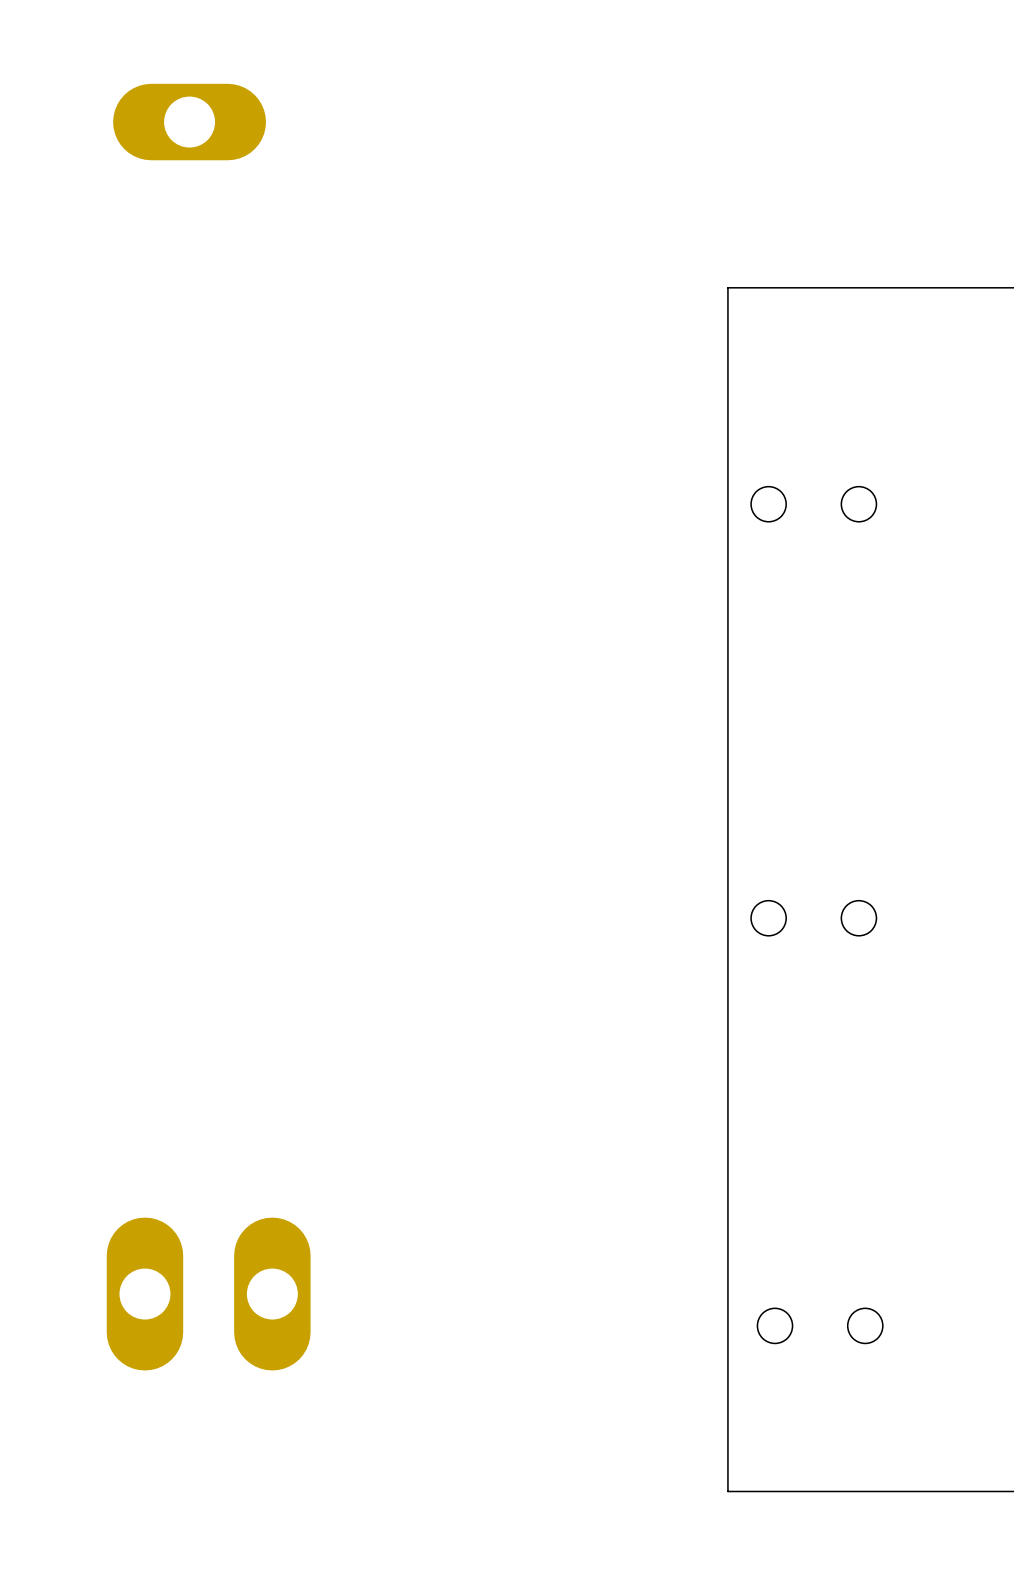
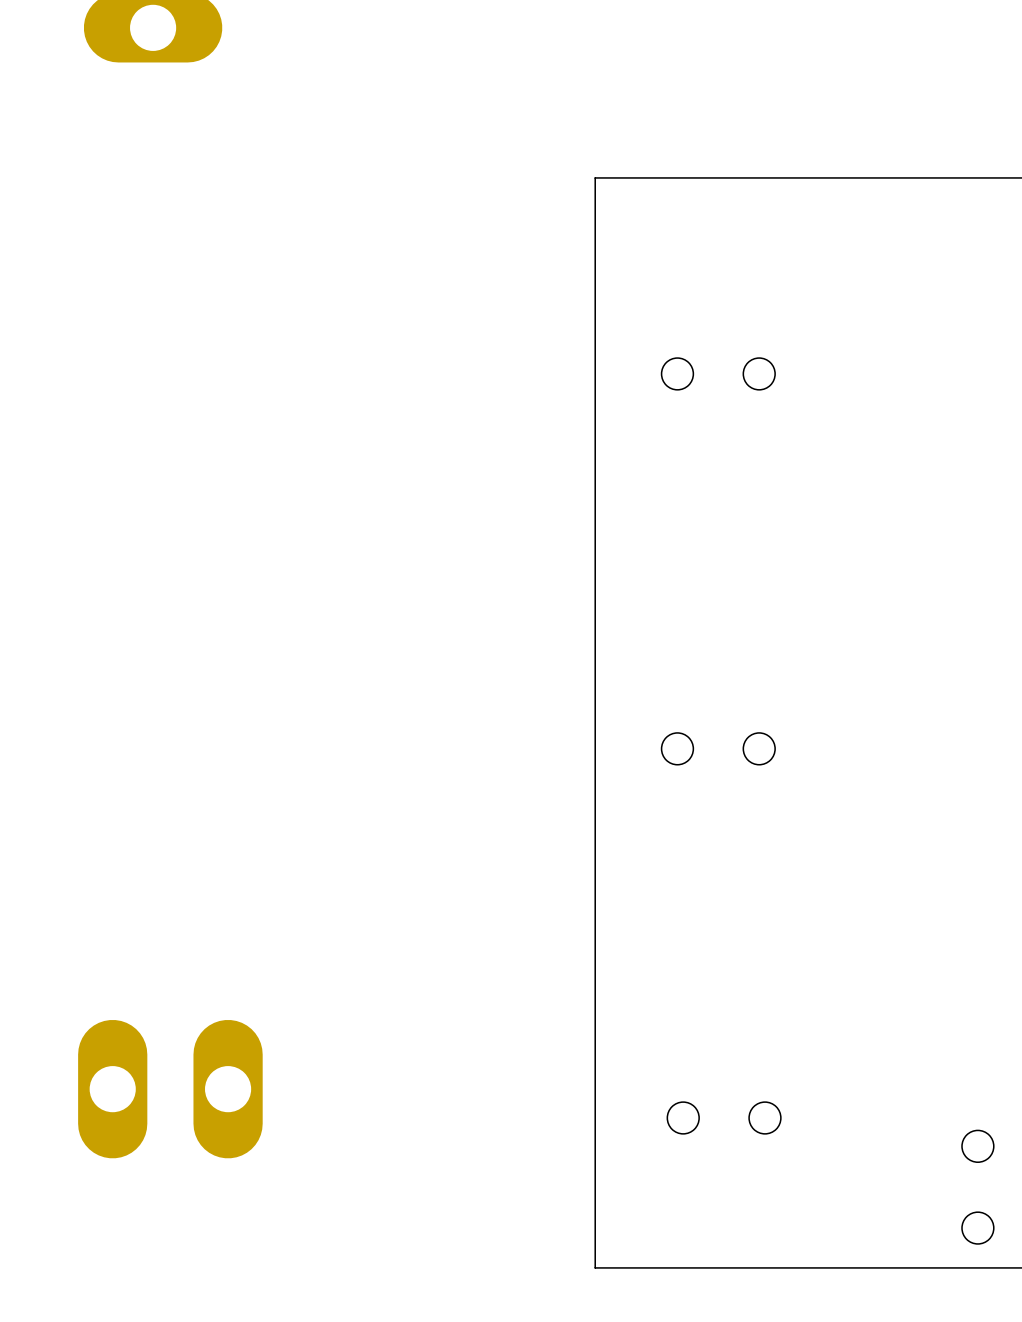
board edge: (727, 287) (727, 1491) -> (640, 177) (595, 177) (595, 1267) (640, 1267)

